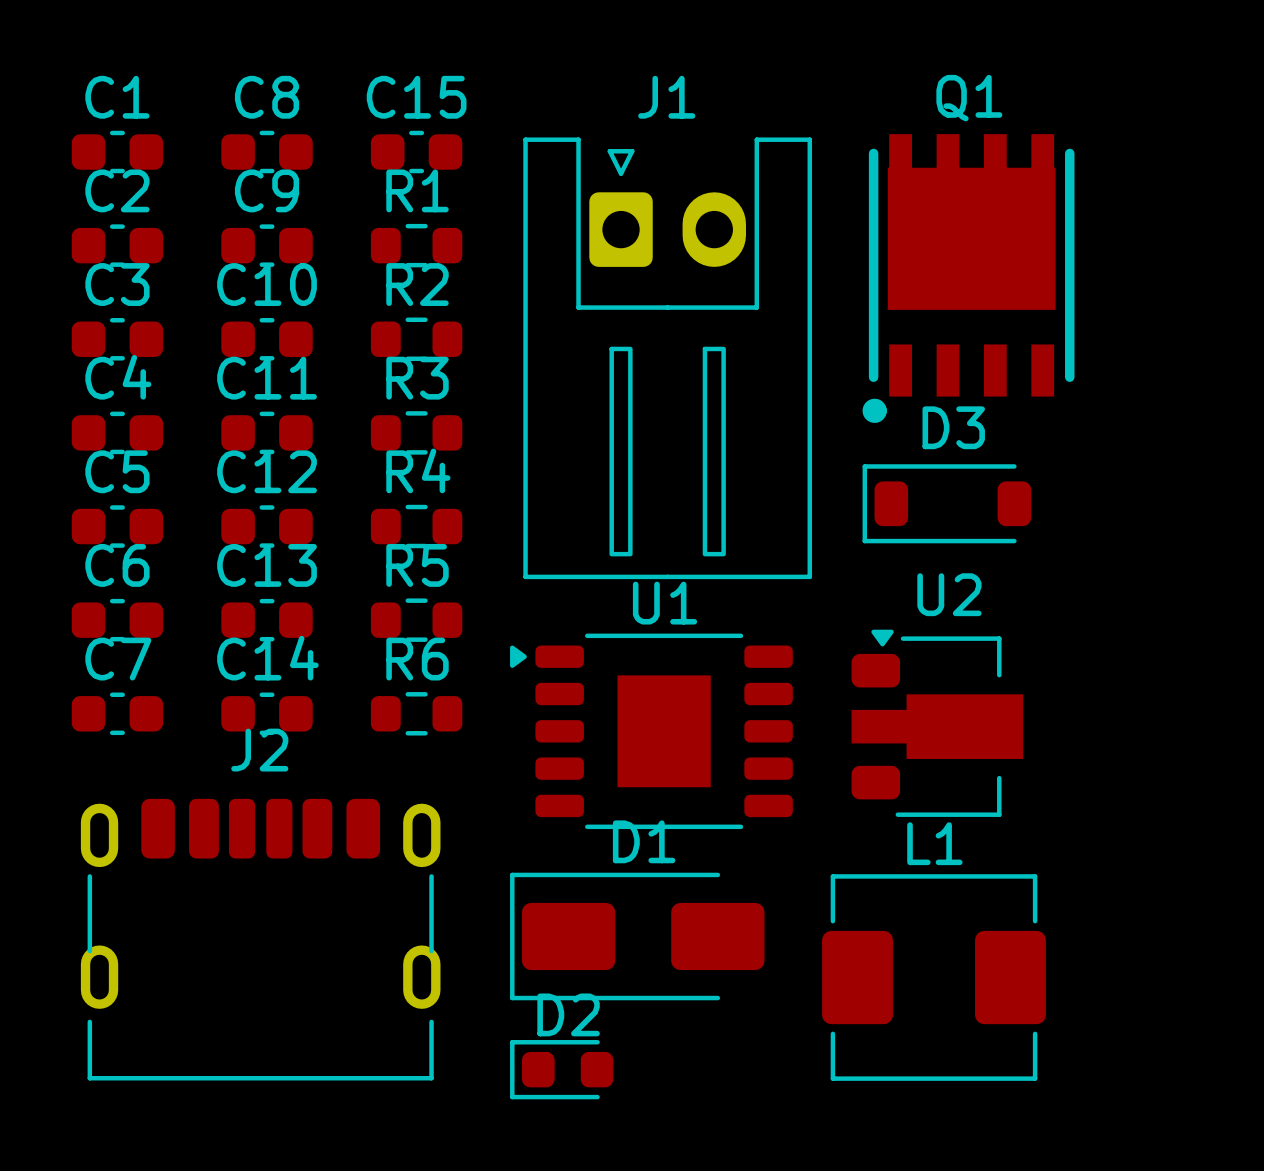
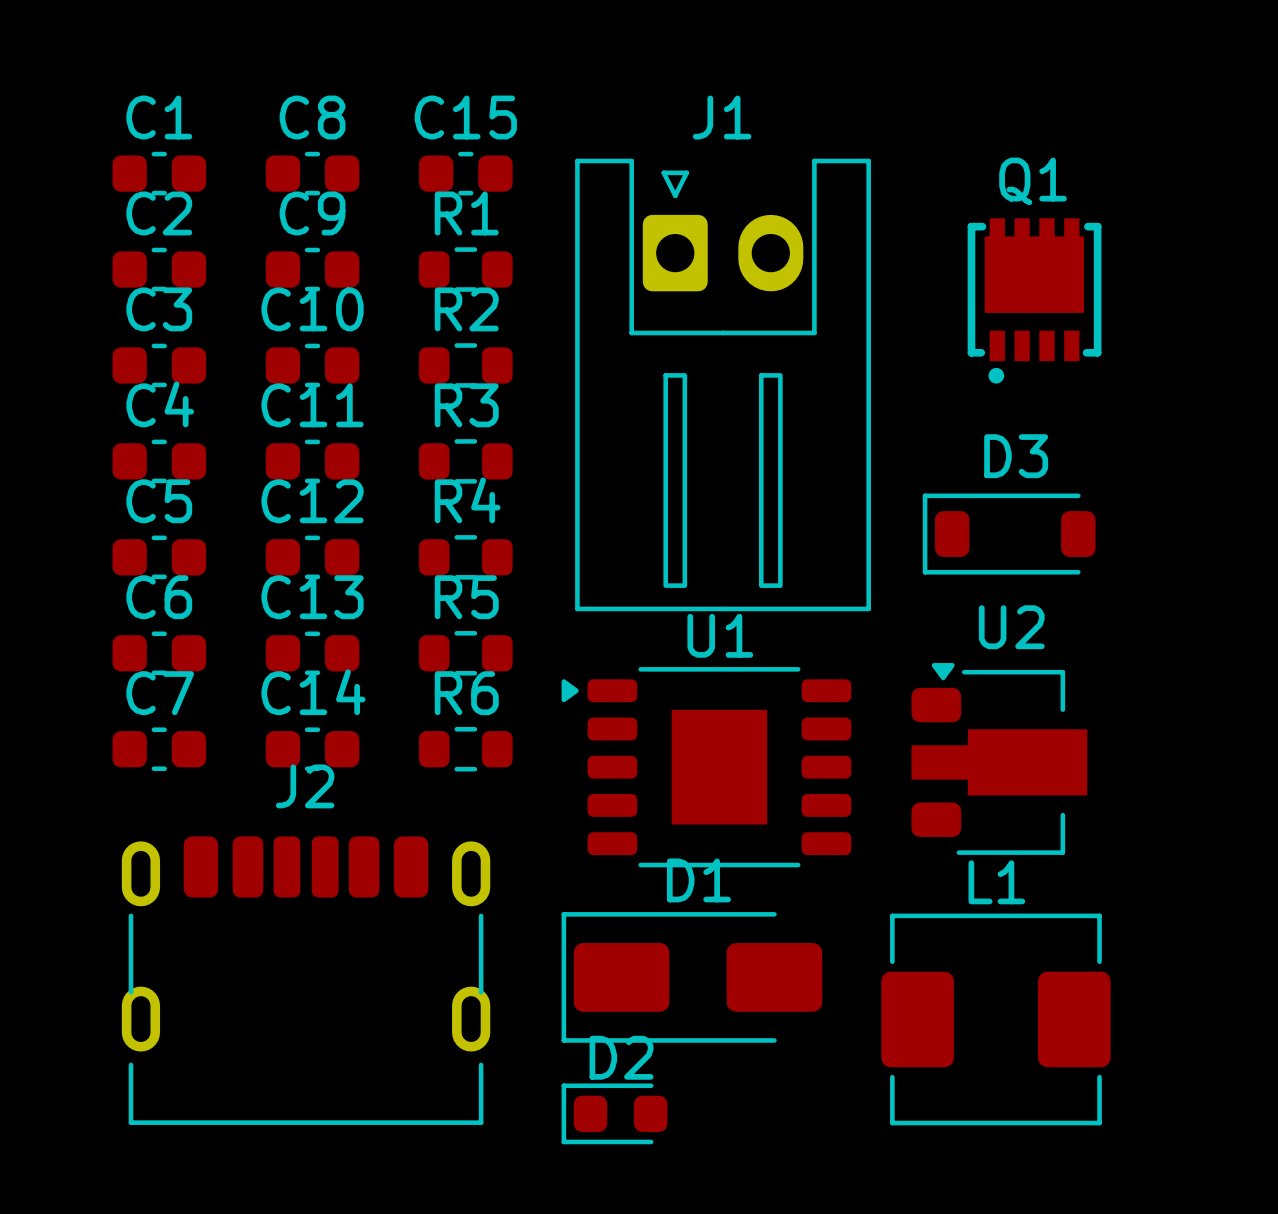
Q1 footprint: [862, 134, 1075, 423] -> [967, 218, 1102, 384]

